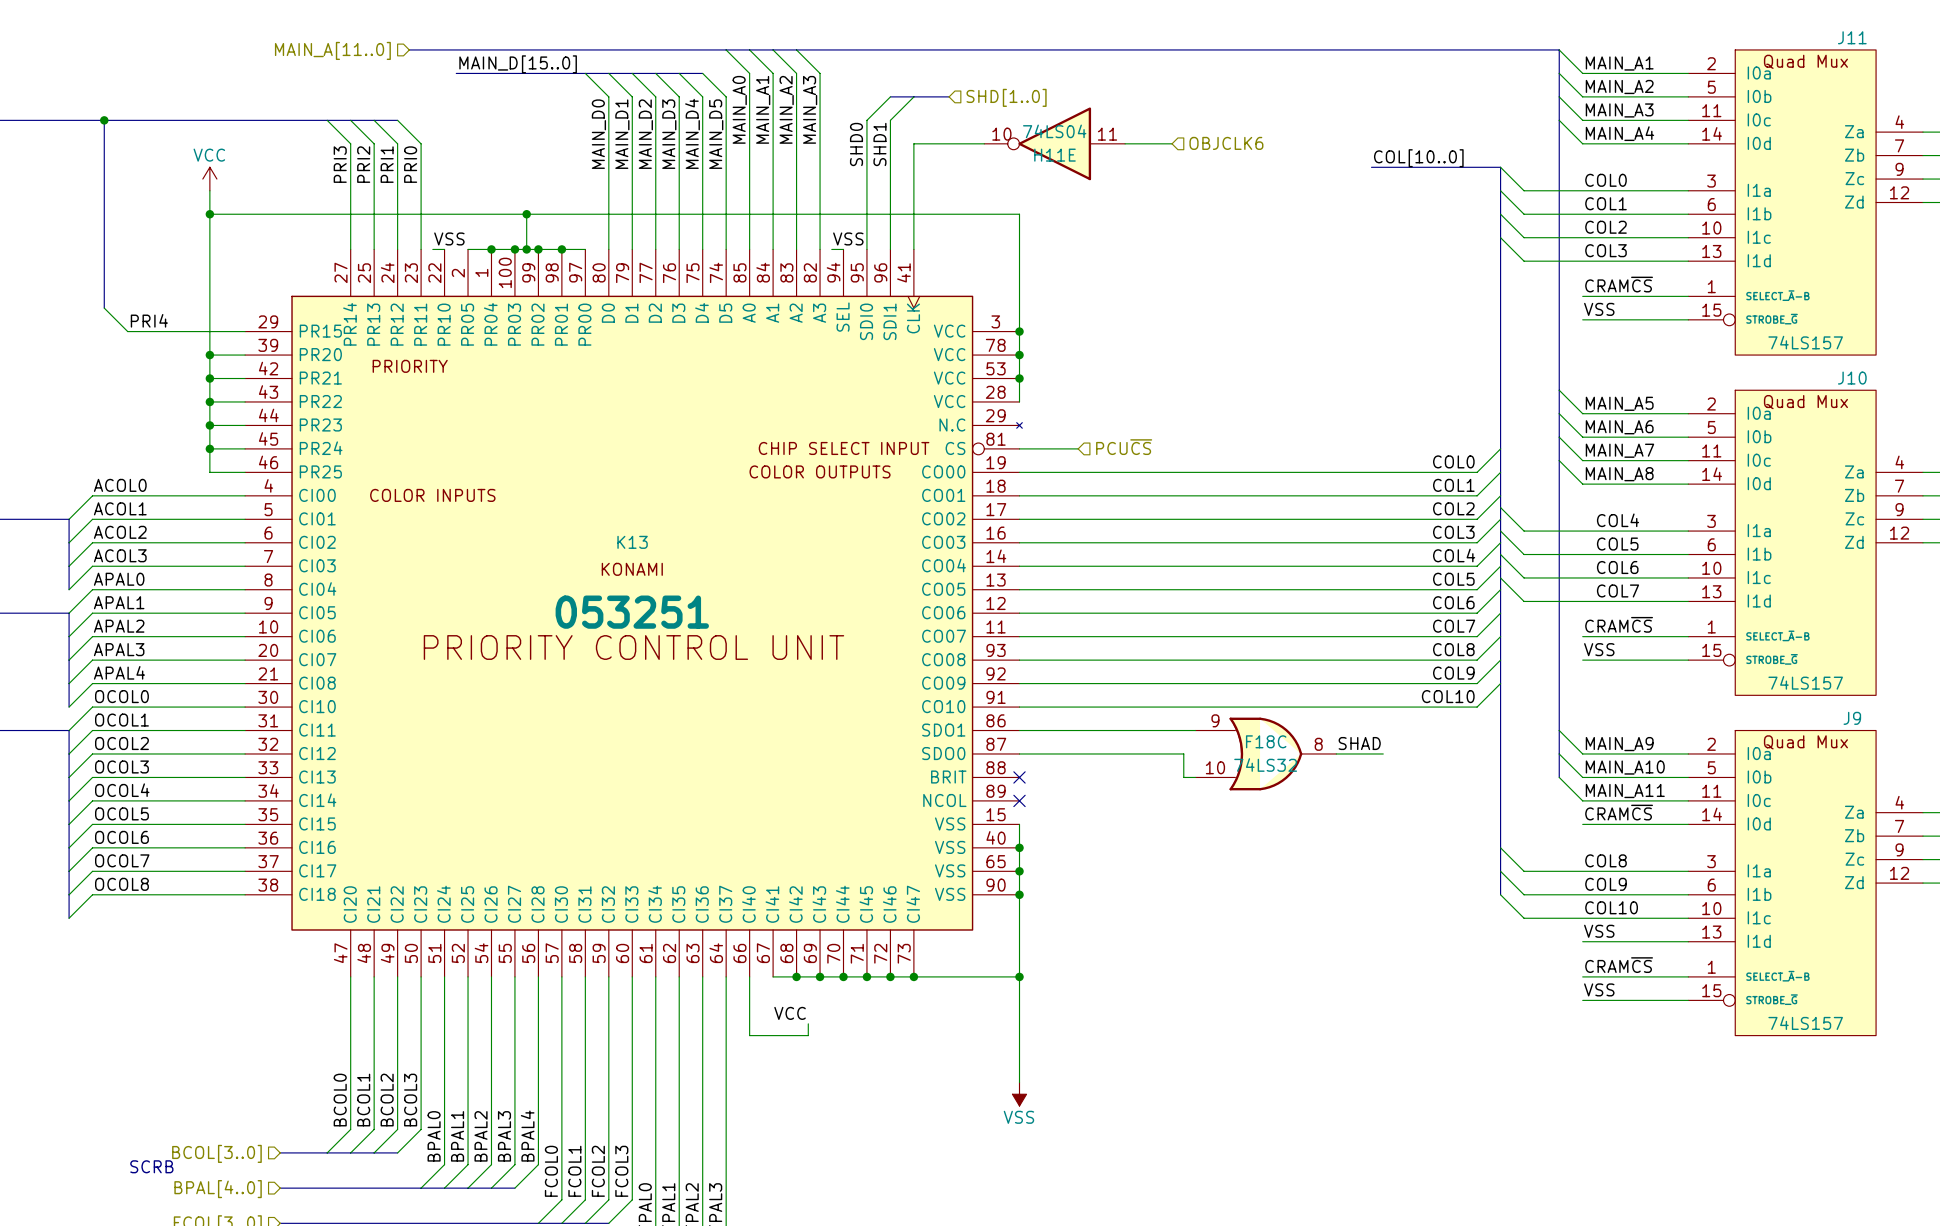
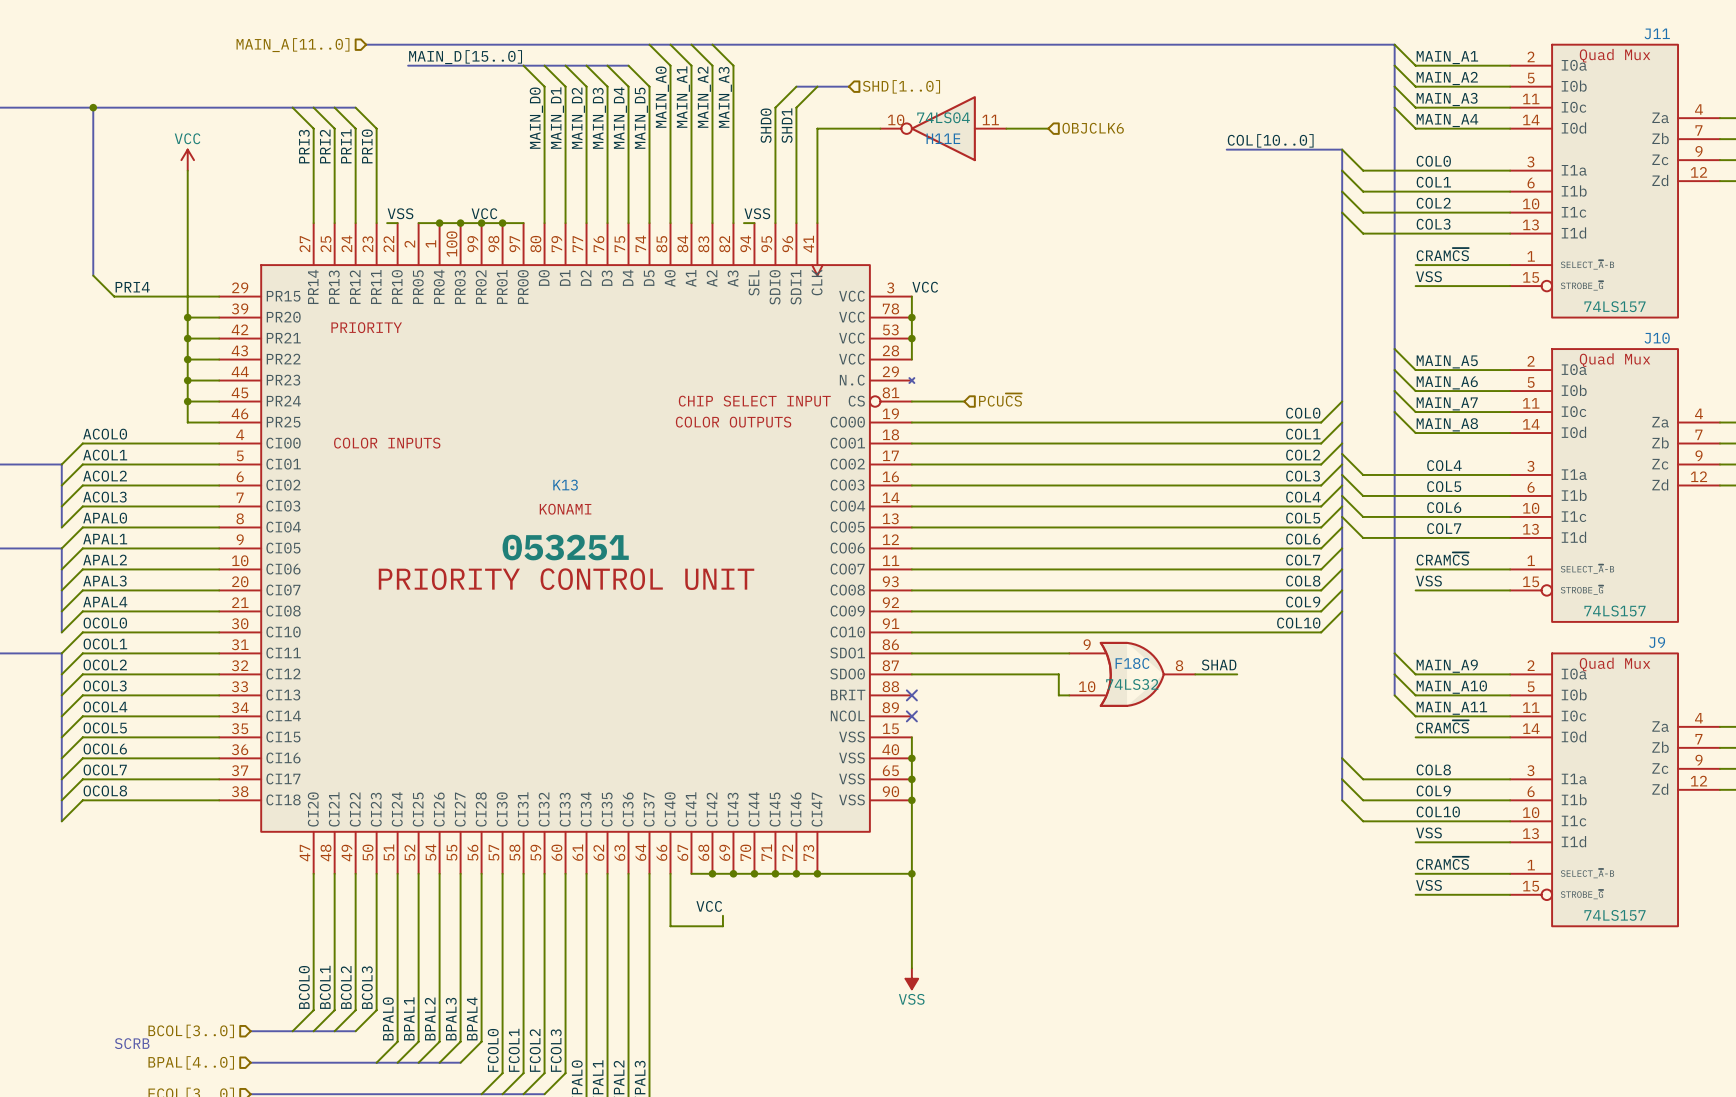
wire: (209, 214) (1019, 214) (1019, 331) -> none
junction: (209, 214) -> none
wire: (526, 214) (526, 249) -> none
junction: (526, 214) -> none
label: none -> VCC (484, 213)
junction: (526, 249) -> none
label: none -> VCC (925, 287)
junction: (1019, 331) -> none

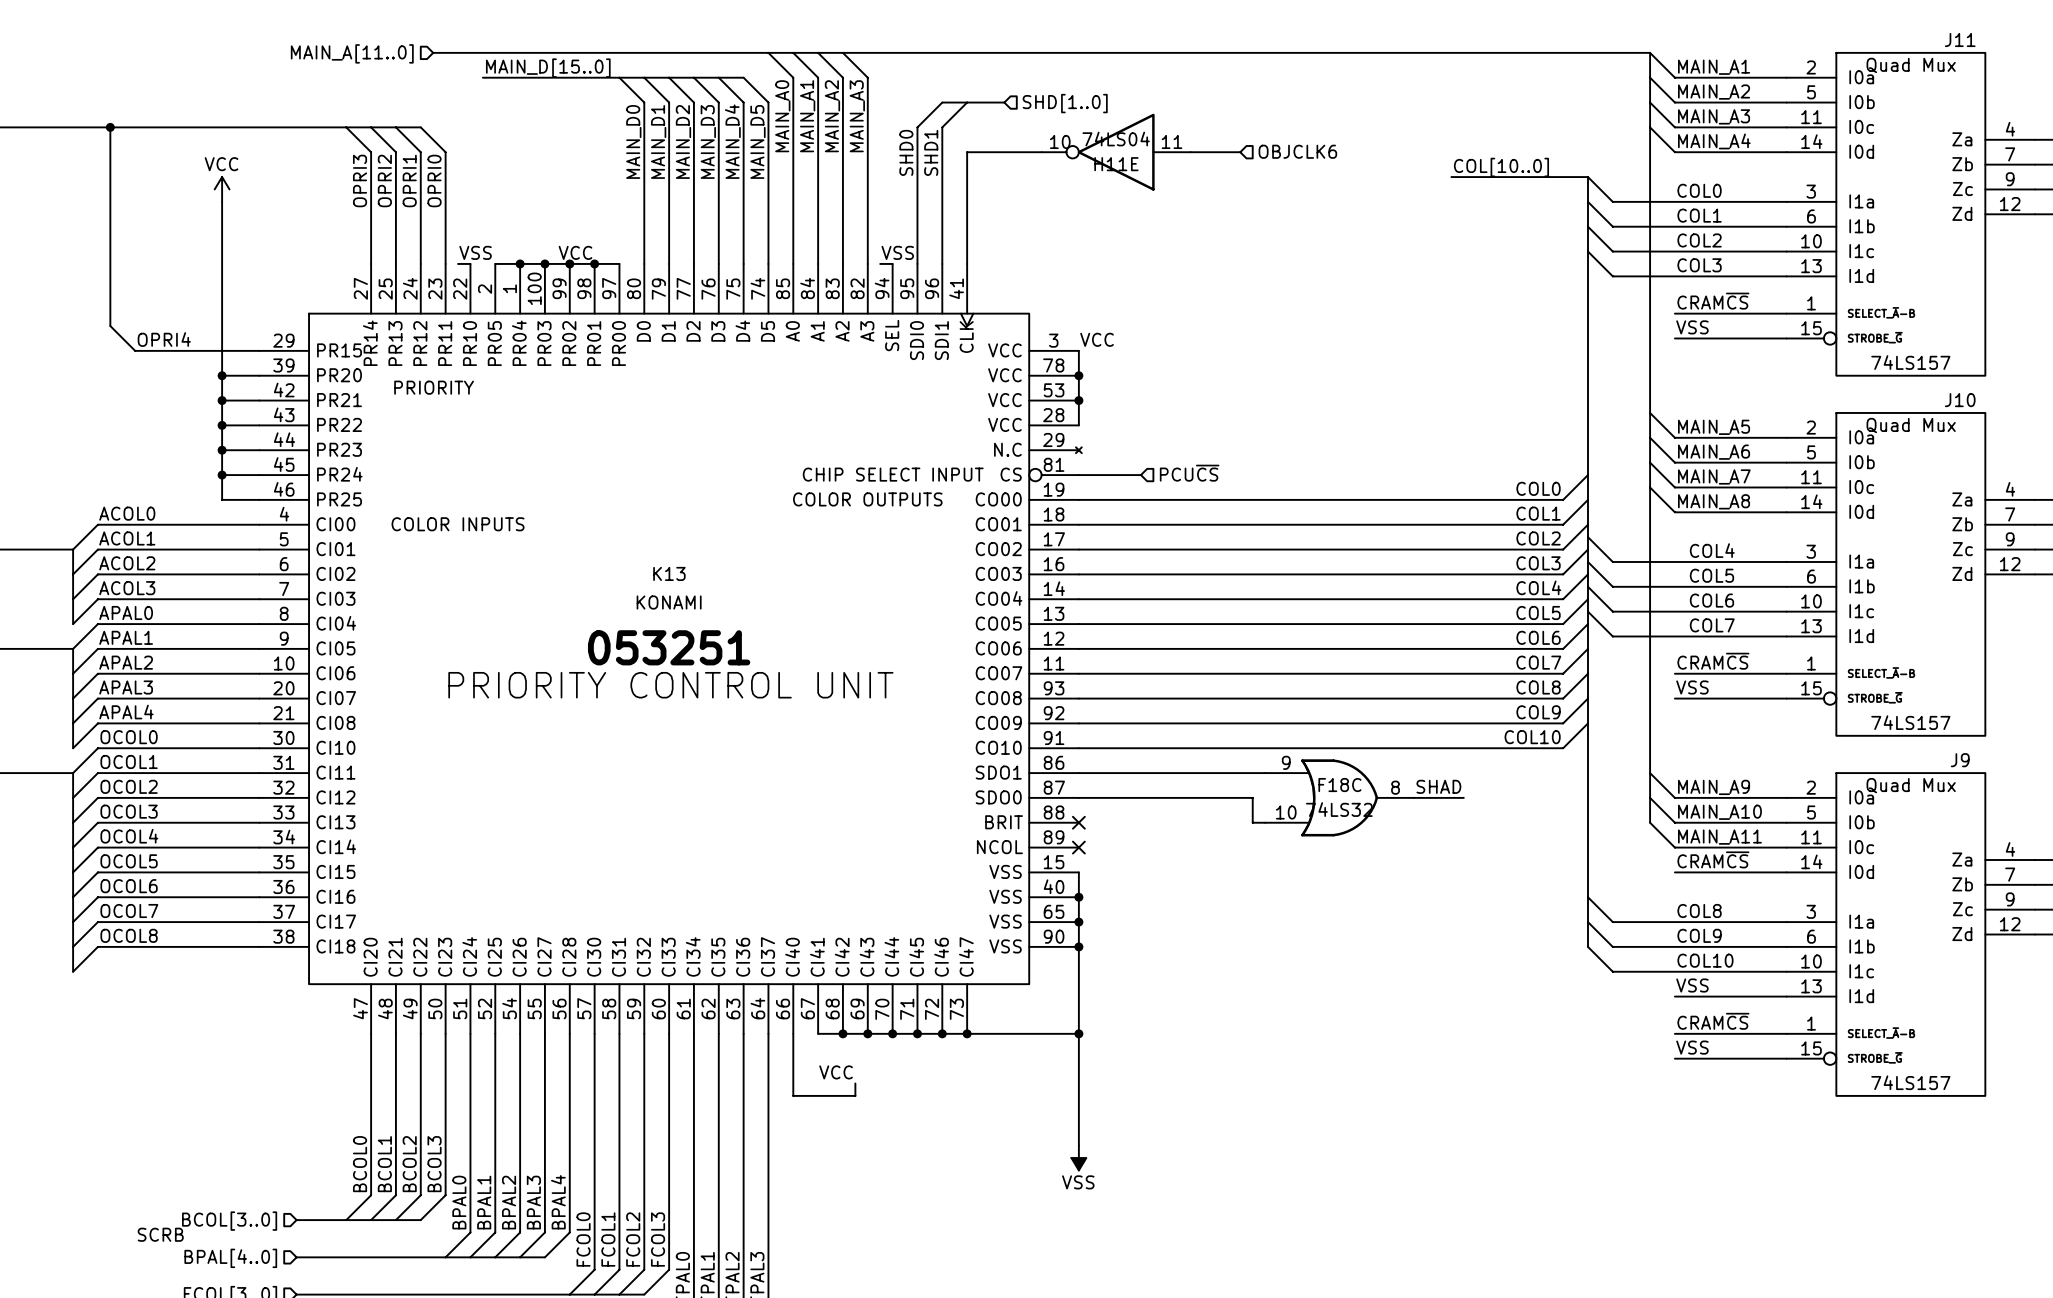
label: PRI3 (304, 146) -> OPRI3 (360, 180)
label: PRI2 (325, 146) -> OPRI2 (384, 180)
label: PRI1 (346, 146) -> OPRI1 (409, 180)
label: PRI0 (367, 146) -> OPRI0 (434, 180)
label: PRI4 (132, 287) -> OPRI4 (164, 339)

